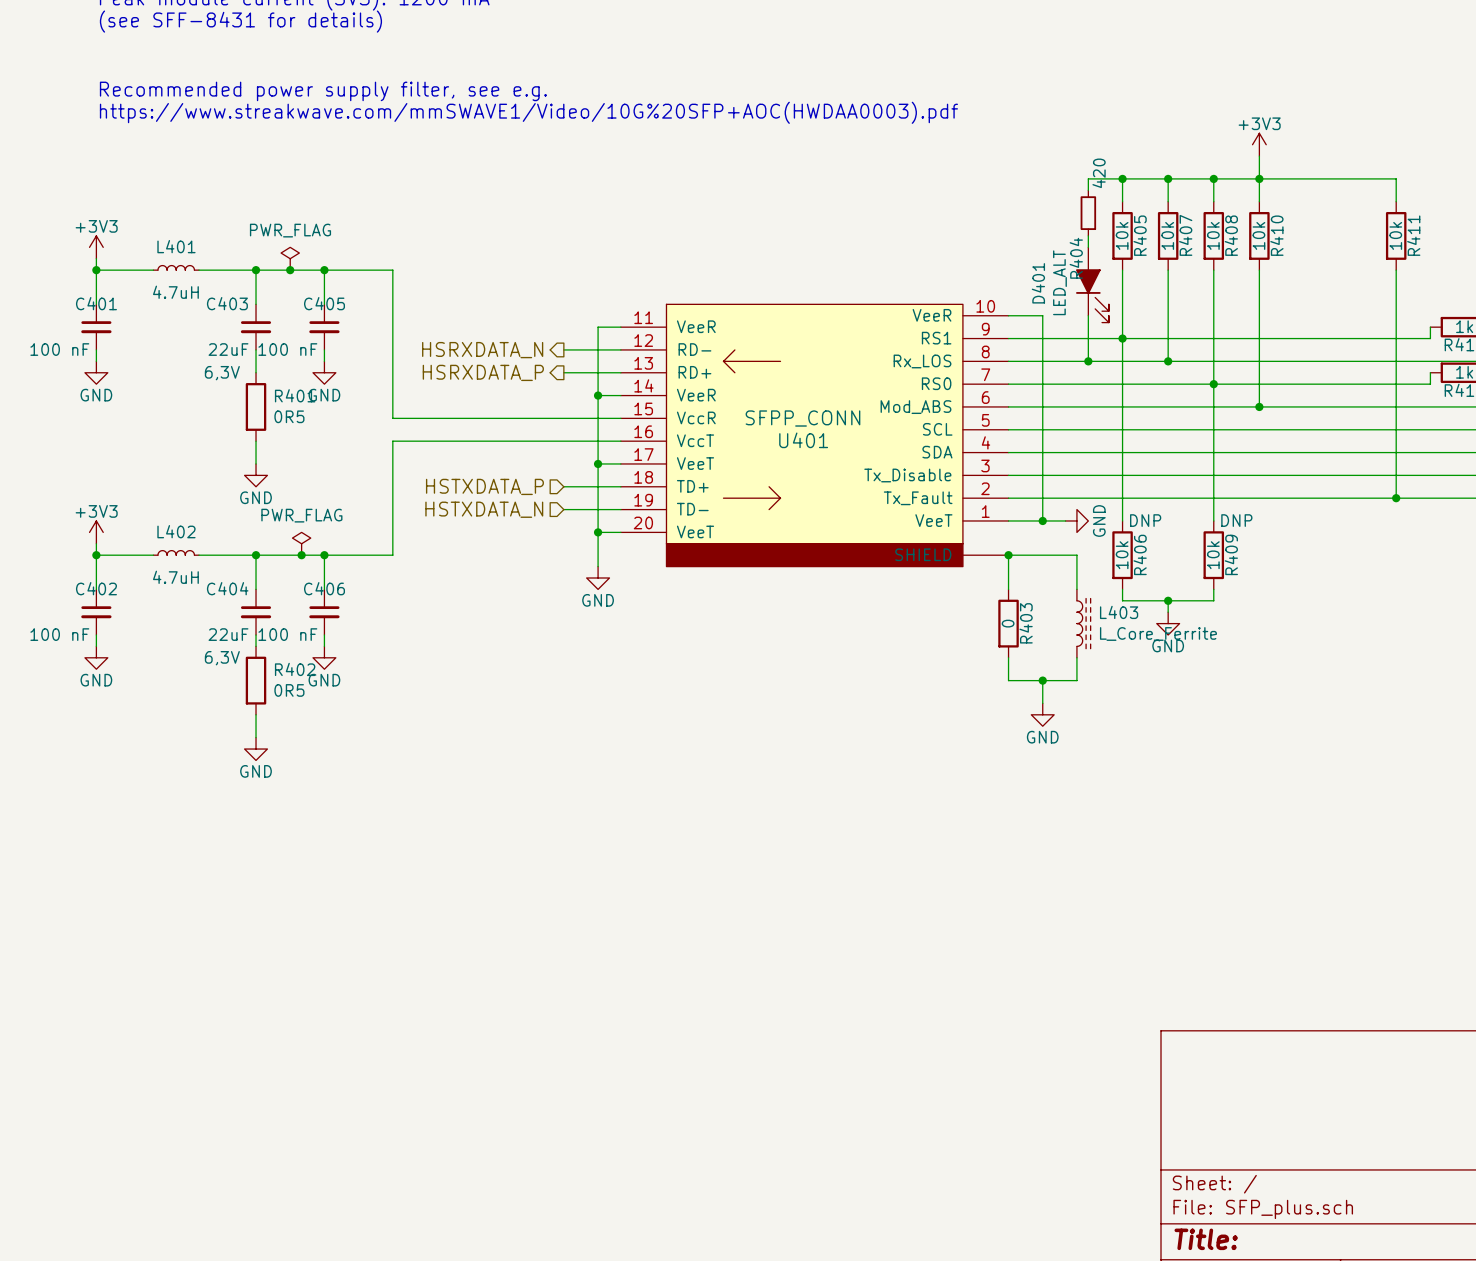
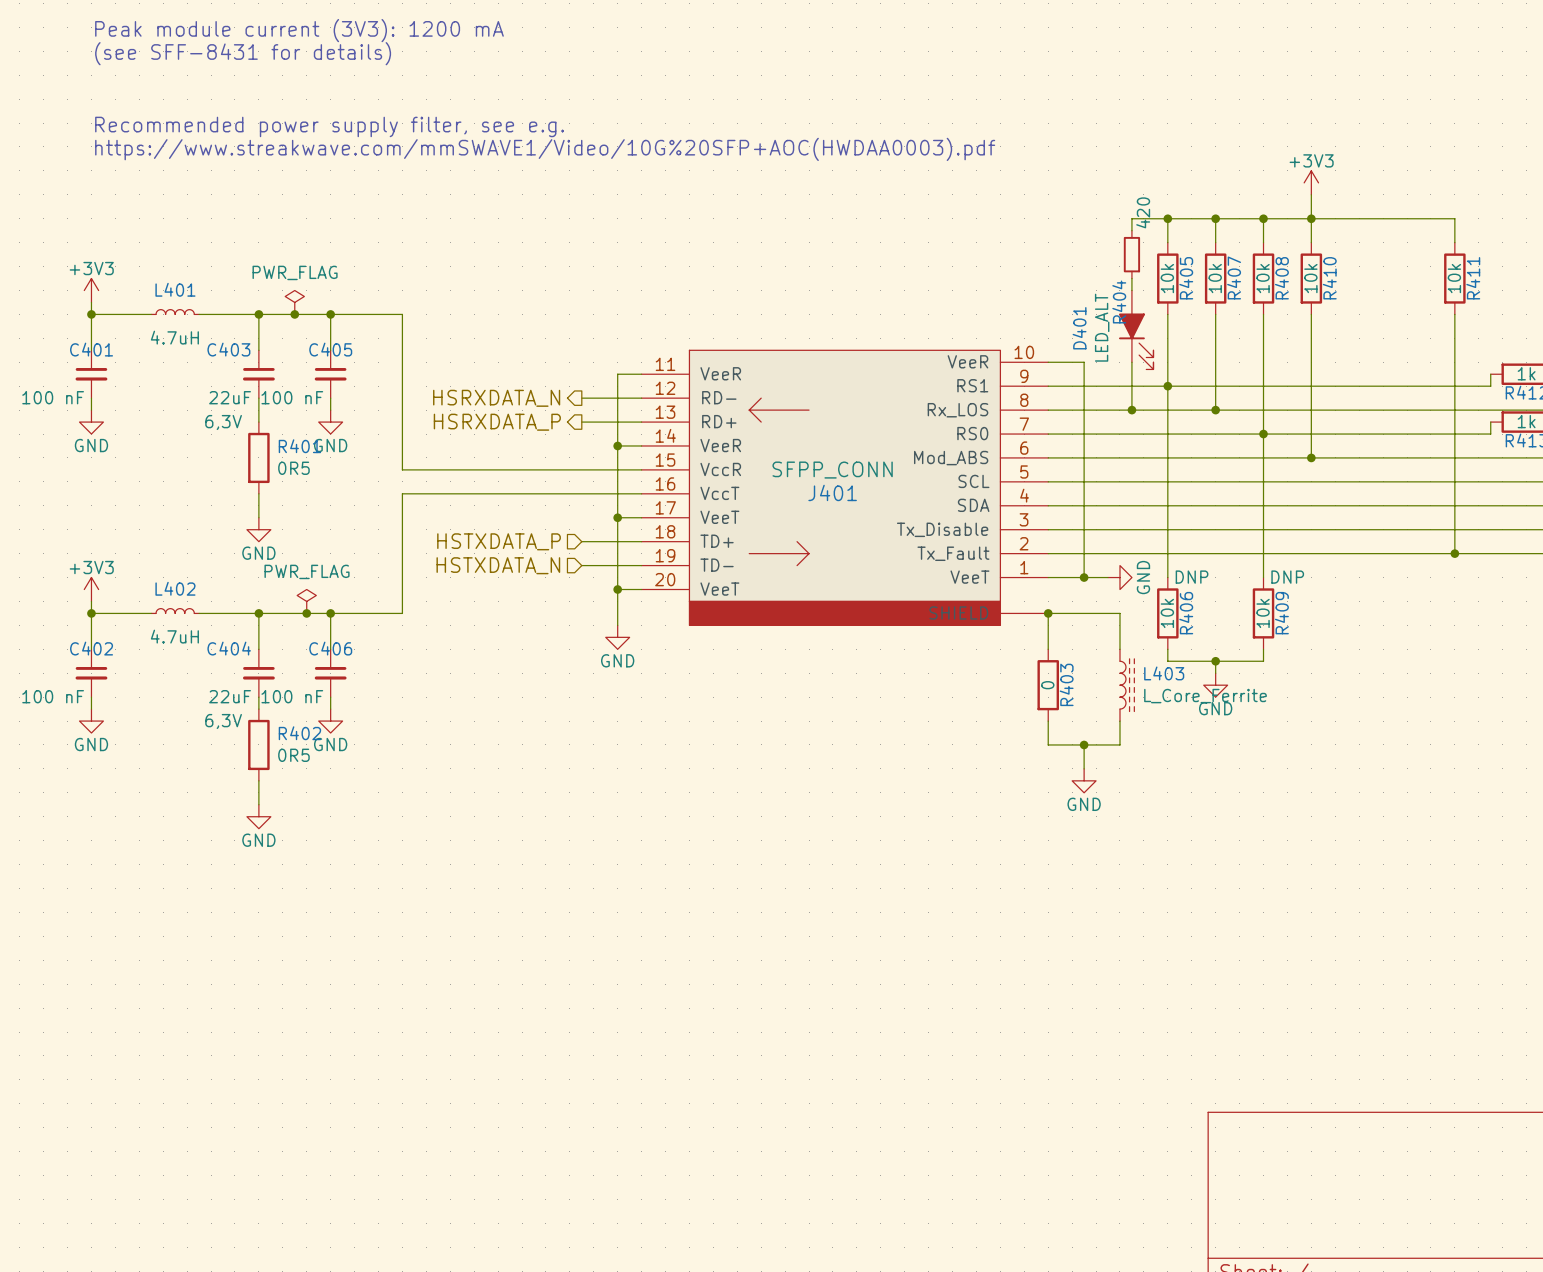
U401 name: U401 (803, 440) -> J401 (832, 492)

